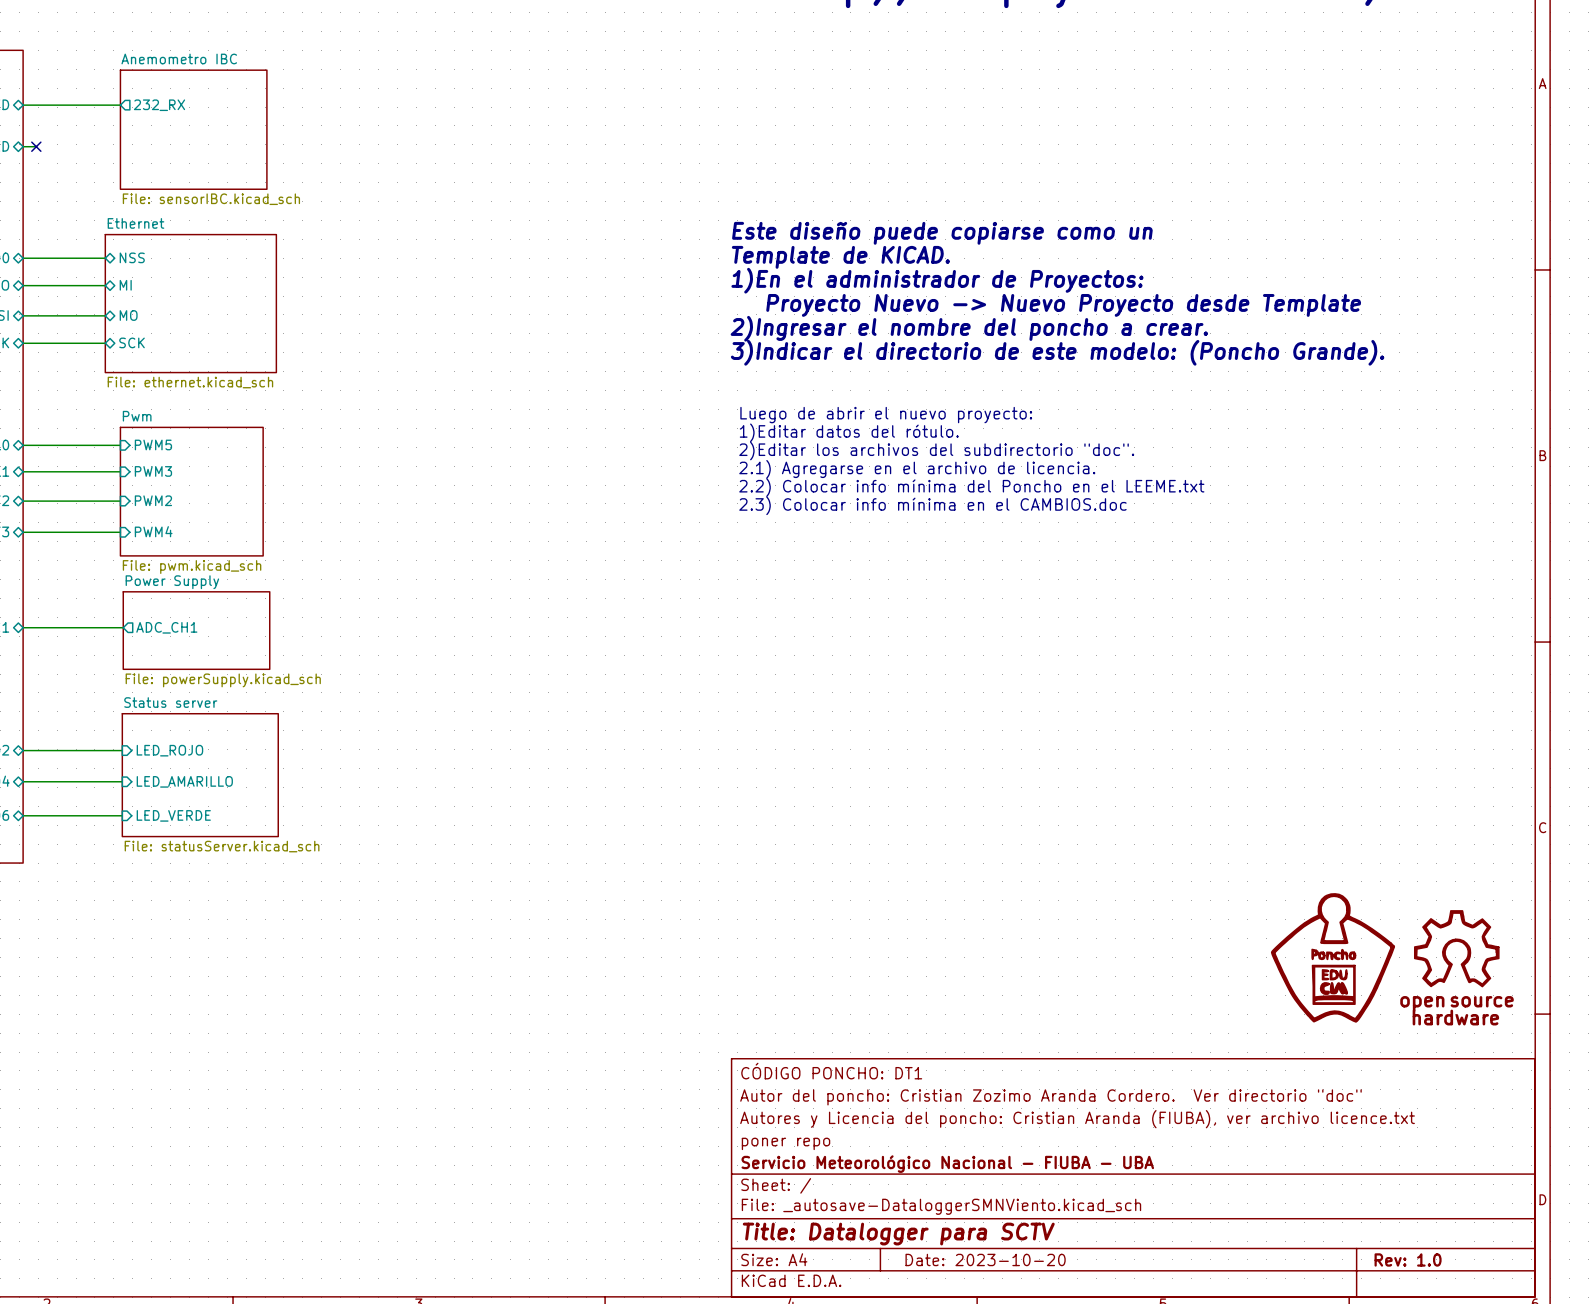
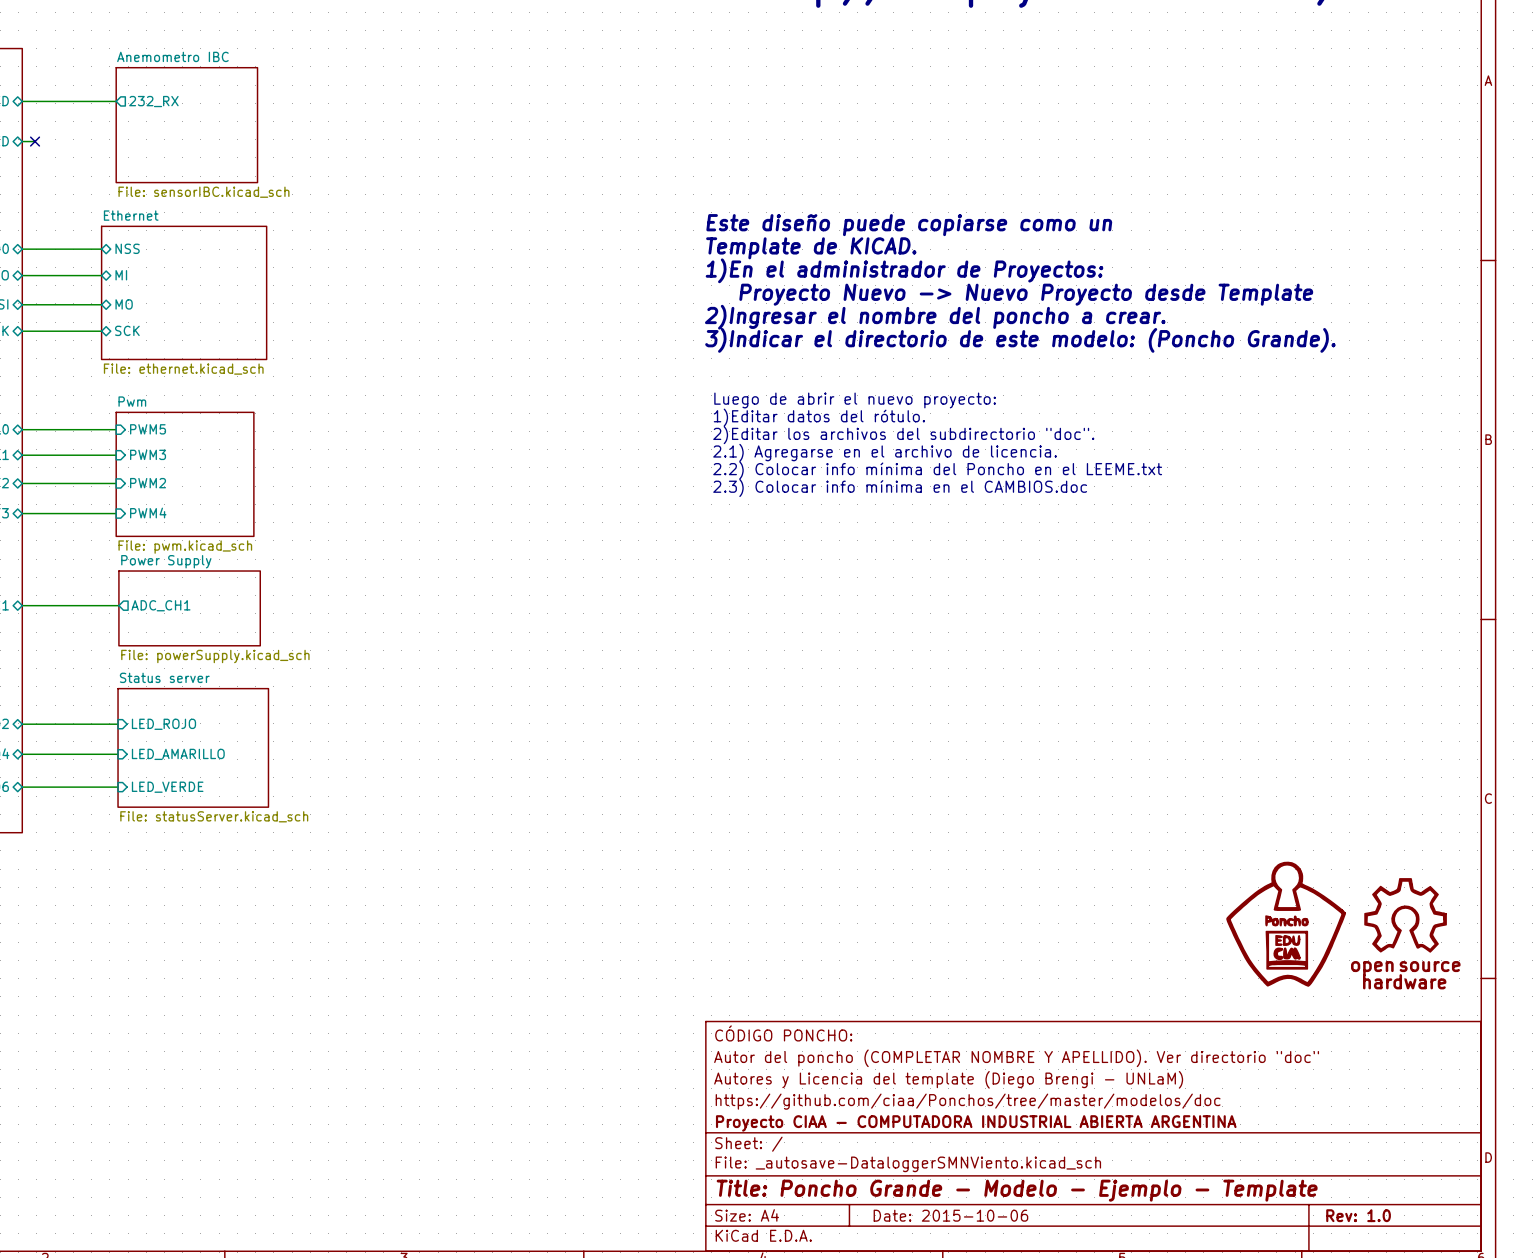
title block: CÓDIGO PONCHO: DT1 (831, 1071) -> CÓDIGO PONCHO: (783, 1033)
title block: Autor del poncho: Cristian Zozimo Aranda Cordero. Ver directorio "doc" (1050, 1097) -> Autor del poncho (COMPLETAR NOMBRE Y APELLIDO). Ver directorio "doc" (1016, 1058)
title block: Autores y Licencia del poncho: Cristian Aranda (FIUBA), ver archivo licence.txt (1077, 1119) -> Autores y Licencia del template (Diego Brengi - UNLaM) (948, 1079)
title block: poner repo (786, 1143) -> https://github.com/ciaa/Ponchos/tree/master/modelos/doc (968, 1101)
title block: Servicio Meteorológico Nacional - FIUBA - UBA (947, 1164) -> Proyecto CIAA - COMPUTADORA INDUSTRIAL ABIERTA ARGENTINA (976, 1123)
title block: Title: Datalogger para SCTV (898, 1234) -> Title: Poncho Grande - Modelo - Ejemplo - Template (1017, 1190)
title block: Date: 2023-10-20 (985, 1259) -> Date: 2015-10-06 (950, 1215)

